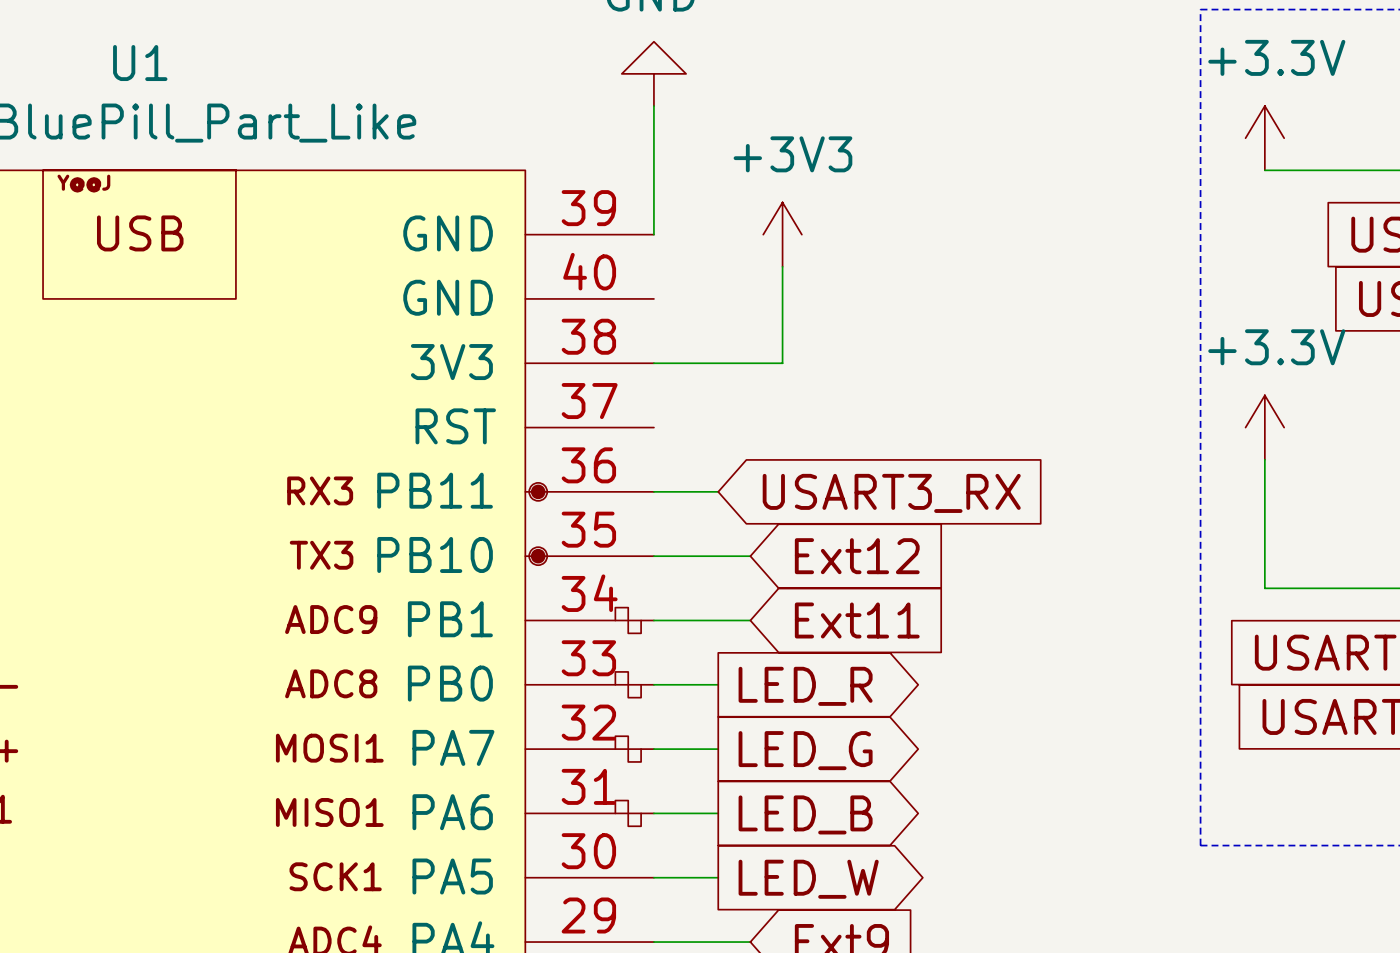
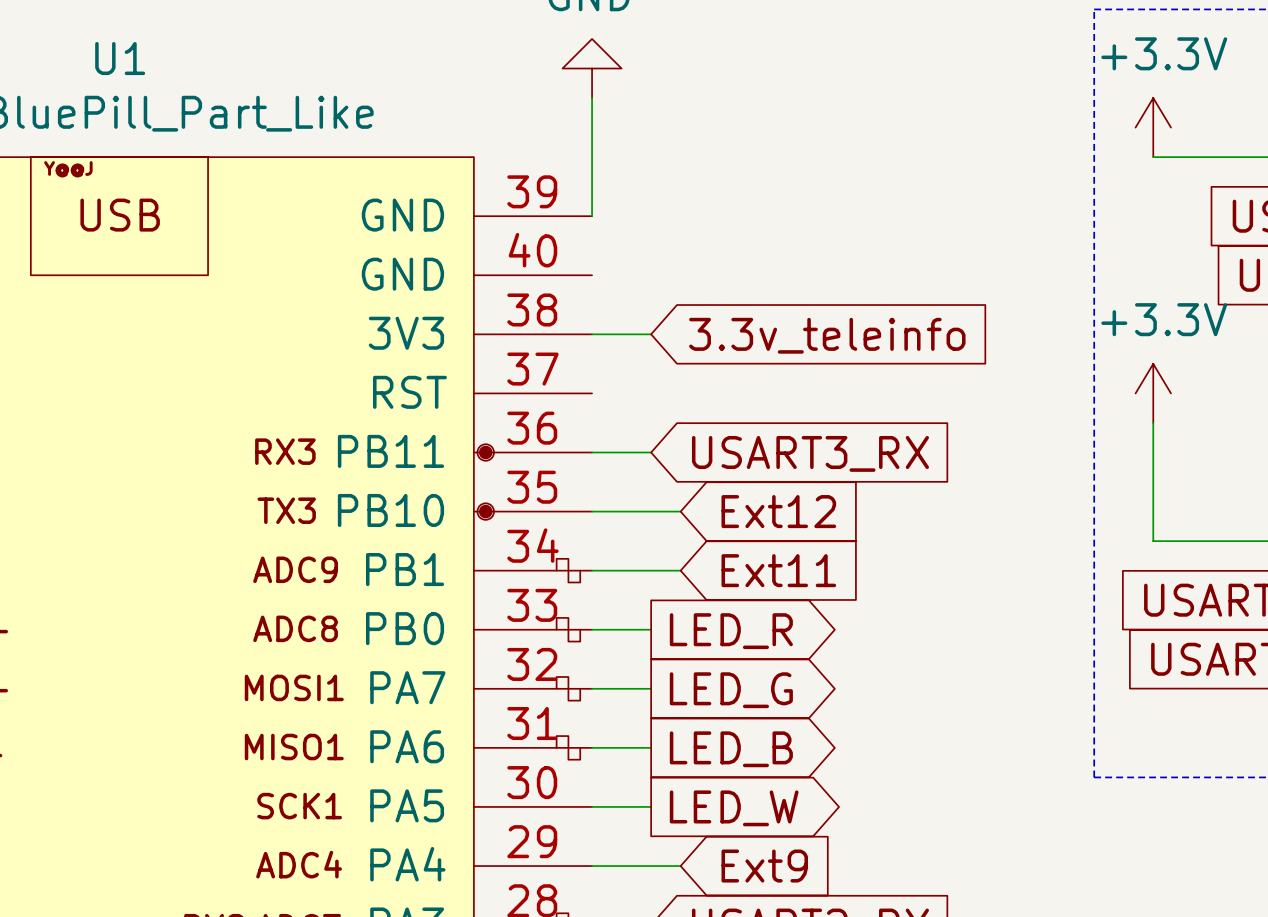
power symbol: +3V3 (782, 234) -> none
wire: (782, 266) (782, 363) (718, 363) -> none
global label: none -> 3.3v_teleinfo (827, 335)

